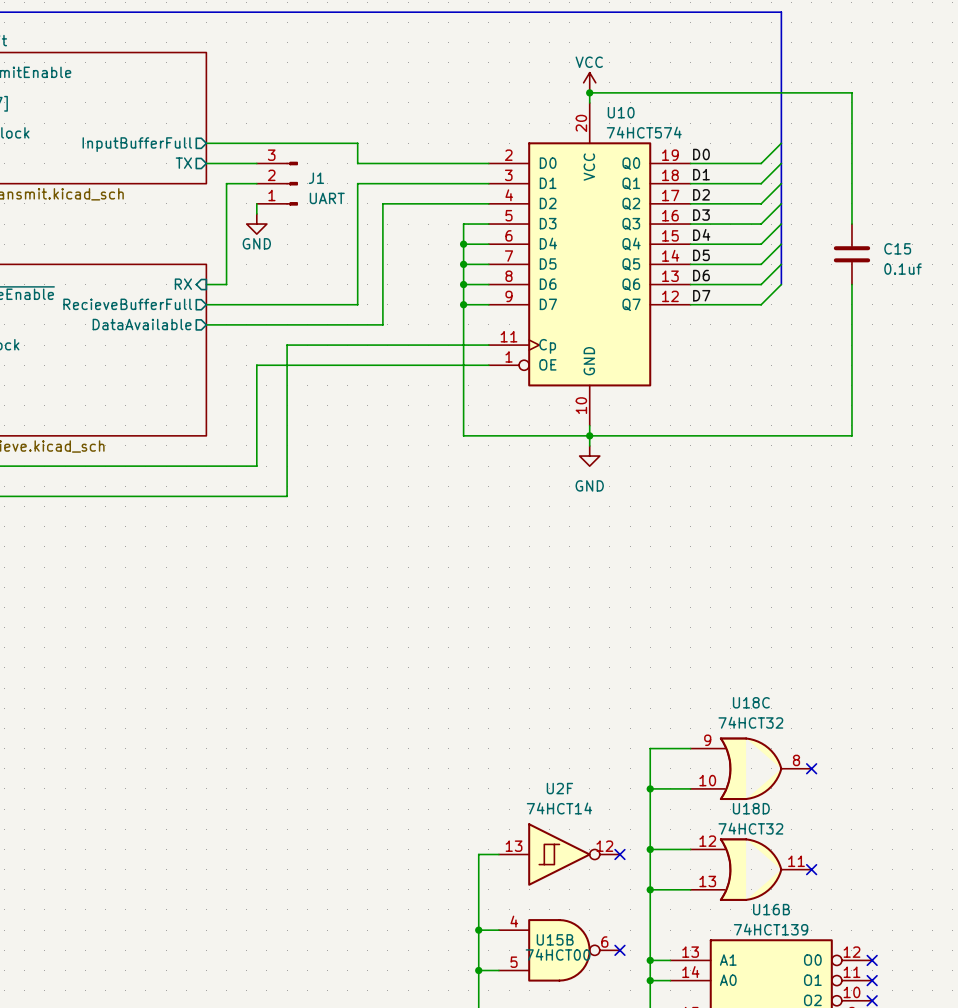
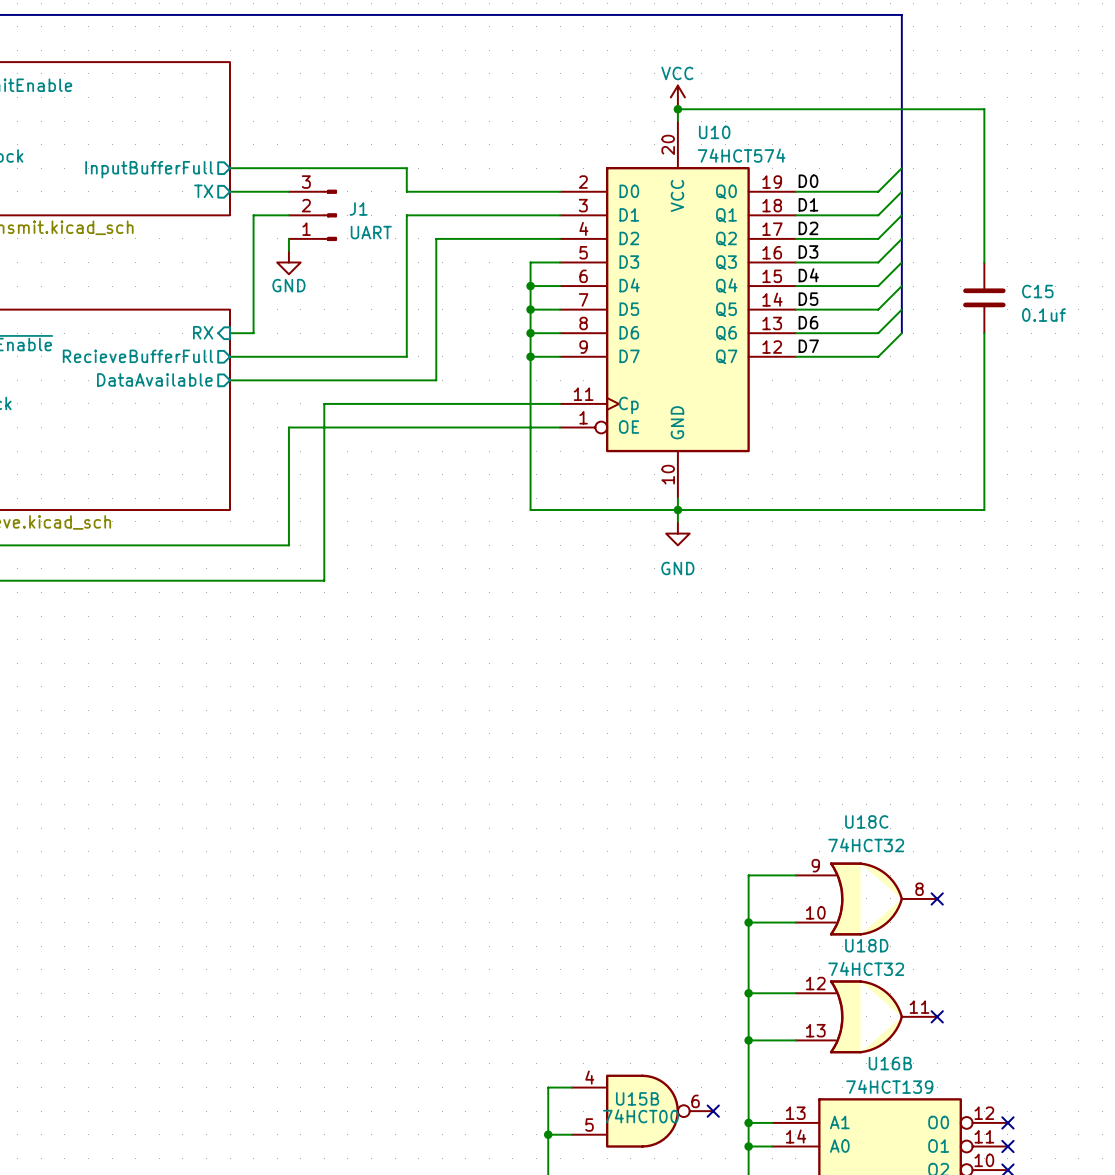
wire: (498, 854) (478, 854) (478, 930) -> none
U2F: 74HCT14 (559, 854) -> none
no-connect mark: (619, 854) -> none
junction: (478, 930) -> none

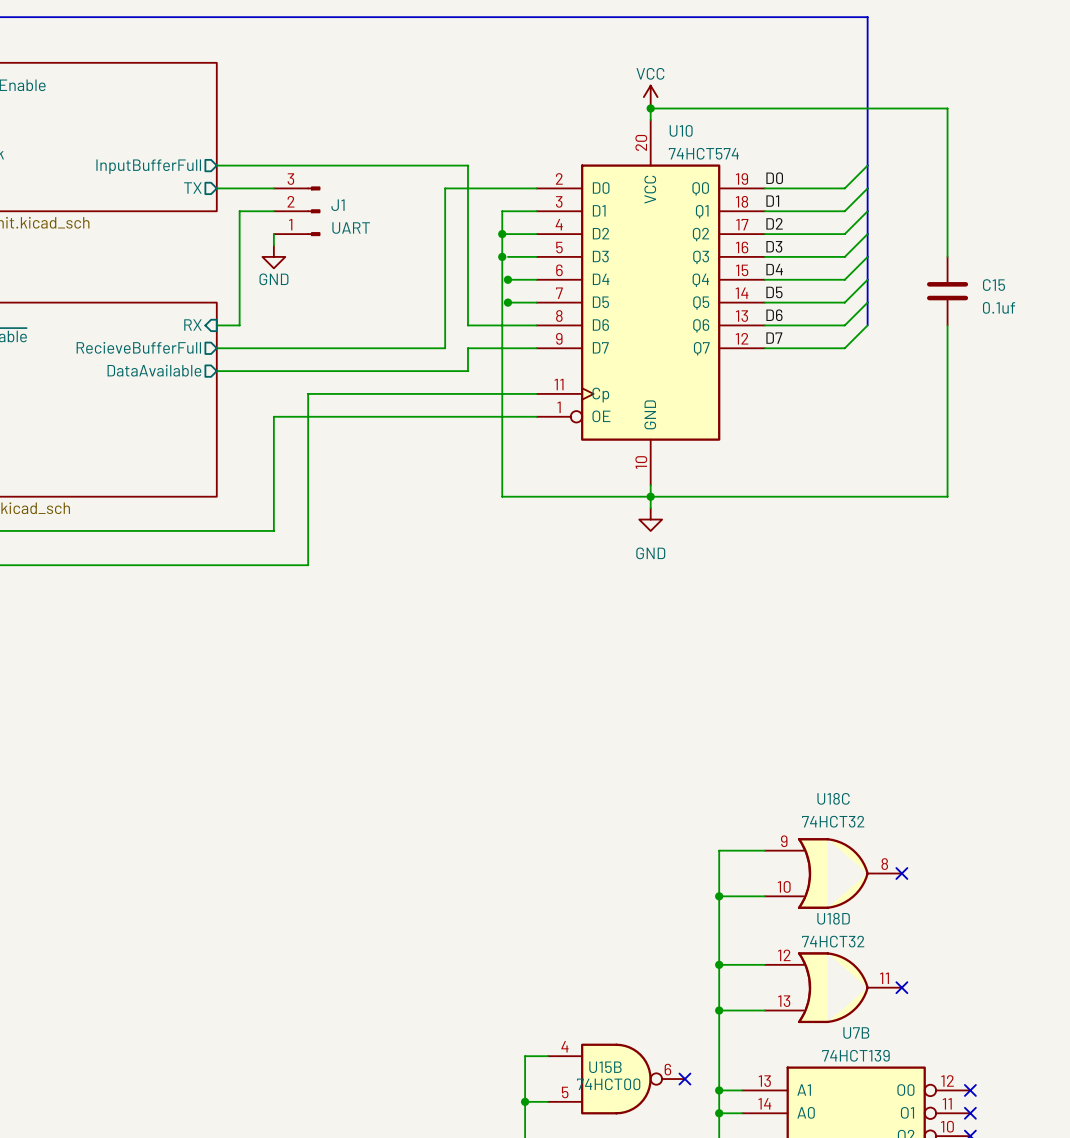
wire: (406, 168) (406, 191) (465, 191) -> (388, 165) (468, 165) (468, 325) (507, 325)
wire: (524, 215) (406, 215) (406, 356) -> (445, 188) (445, 348) (388, 348)
wire: (524, 238) (436, 238) (436, 380) -> (507, 348) (468, 348) (468, 371) (416, 371)
junction: none -> (502, 234)
junction: none -> (502, 256)
wire: (530, 262) (530, 510) -> (502, 211) (502, 496) (507, 496)
junction: (530, 333) -> none
junction: (530, 356) -> none
U16B name: U16B (890, 1063) -> U7B (856, 1032)

